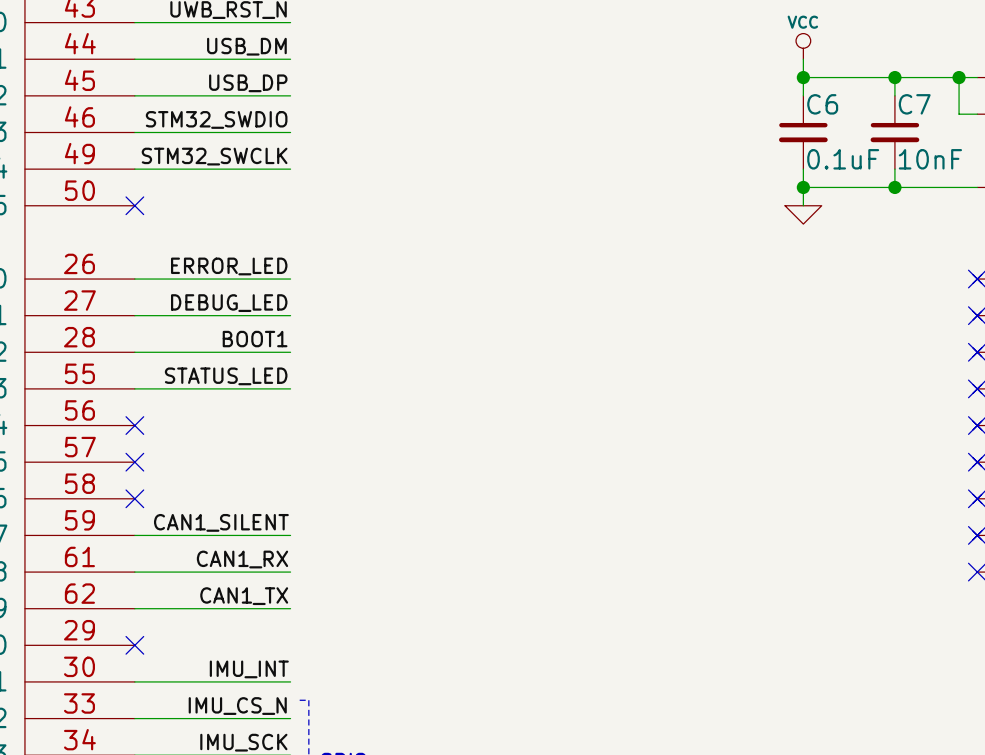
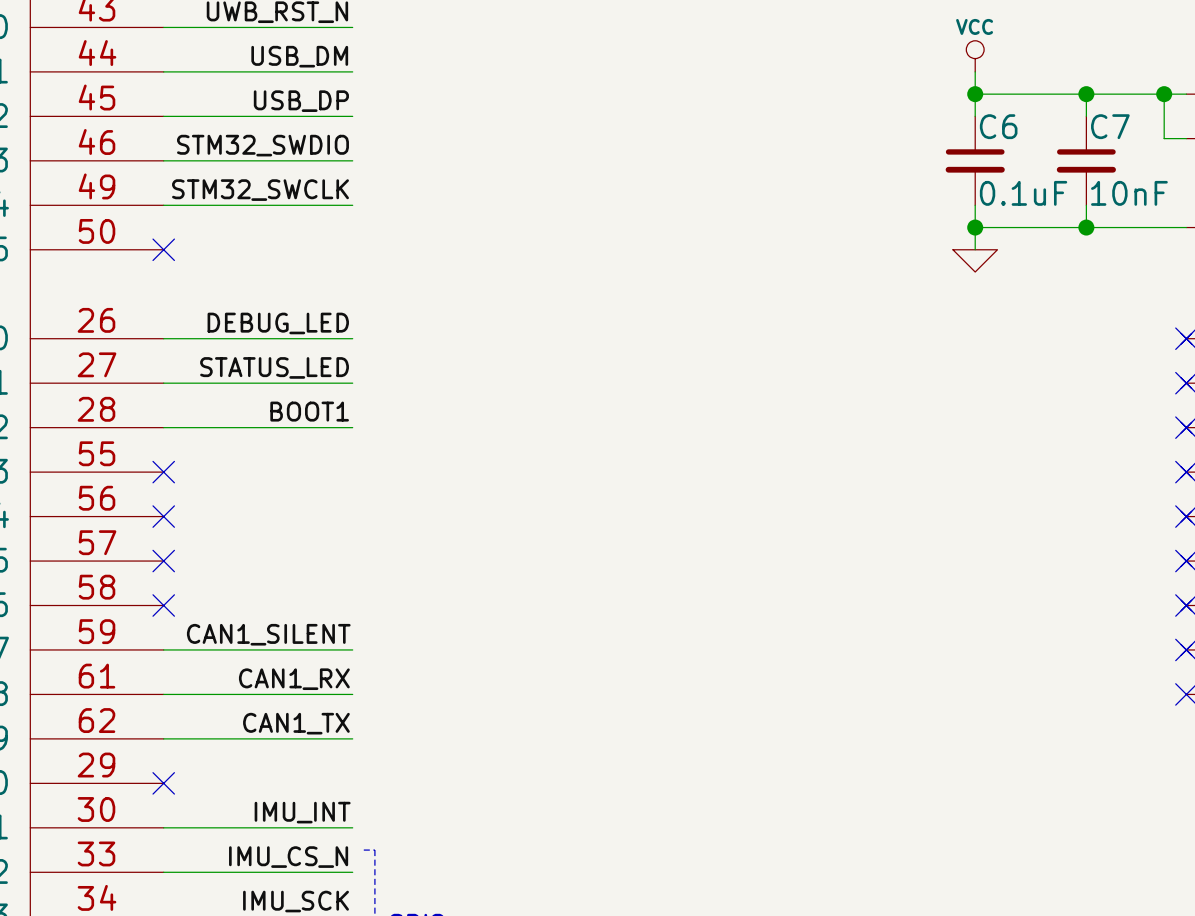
label: ERROR_LED (229, 266) -> DEBUG_LED (278, 323)
label: DEBUG_LED (229, 303) -> STATUS_LED (274, 367)
label: STATUS_LED (226, 376) -> none
wire: (134, 388) (290, 388) -> none
no-connect mark: none -> (163, 472)

